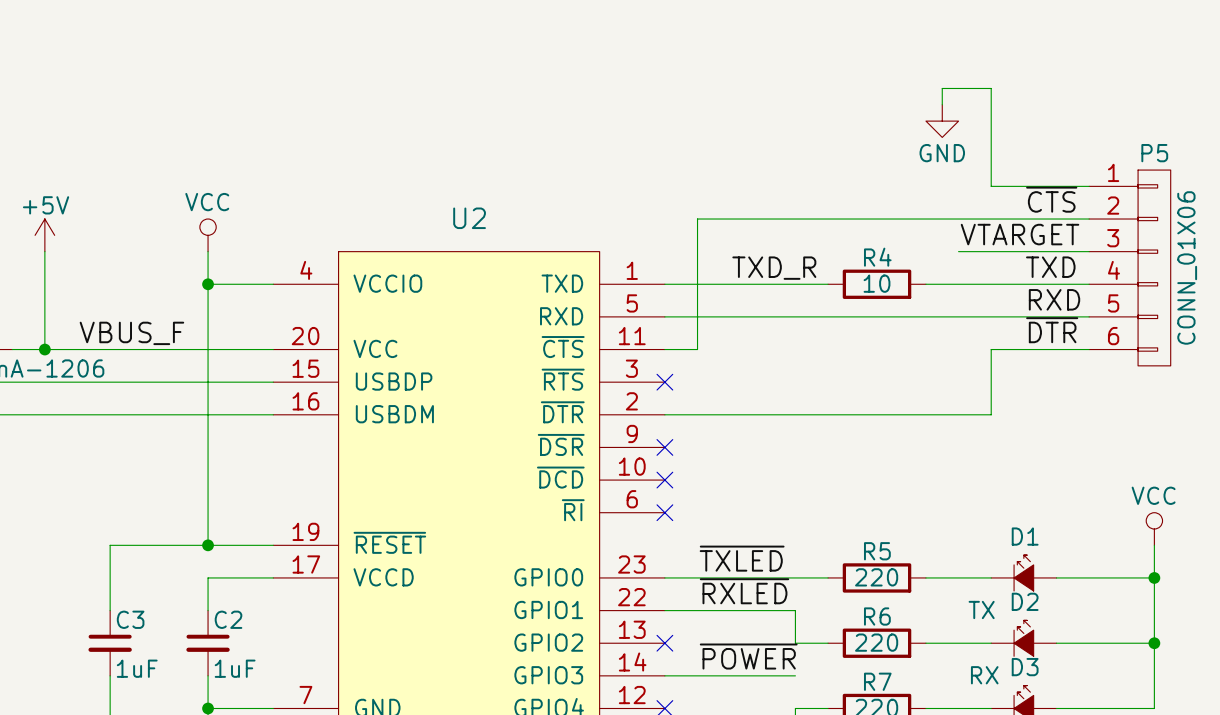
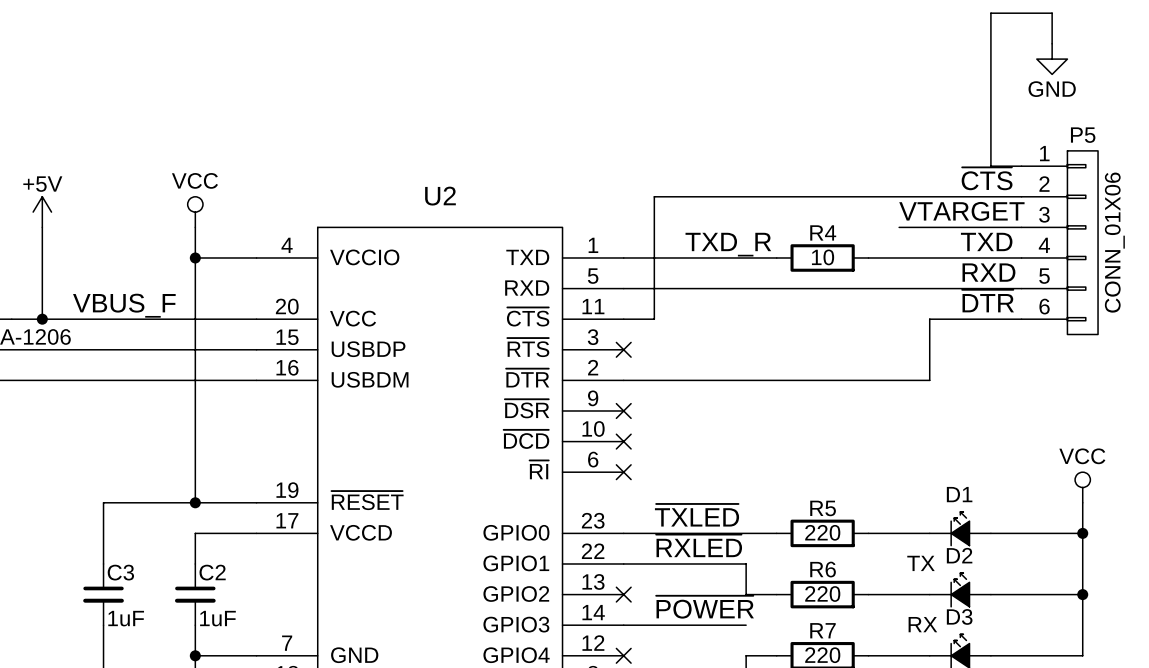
wire: (942, 104) (942, 88) (991, 88) (991, 186) (1056, 186) -> (1052, 43) (1052, 13) (990, 13) (990, 166)
power symbol position: GND (942, 121) -> GND (1052, 59)

